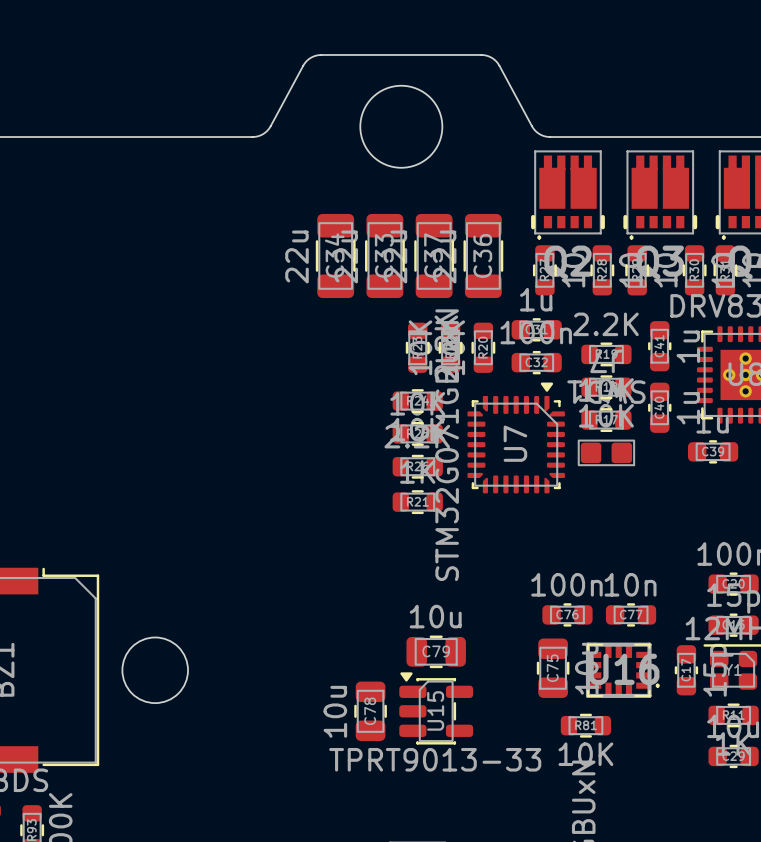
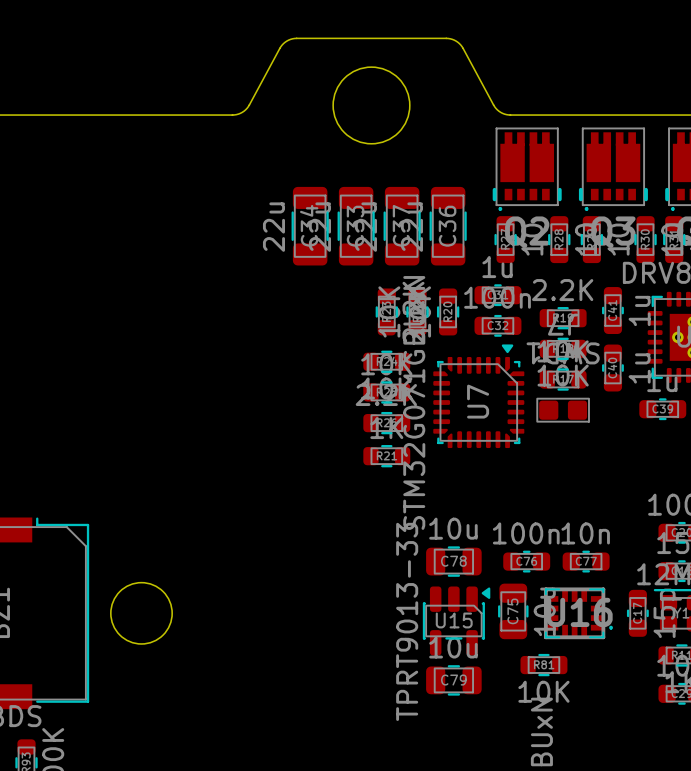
C79 position: (436, 651) -> (453, 680)
U15 rotation: 0° (436, 708) -> 90° clockwise (456, 620)
U15 position: (436, 708) -> (456, 620)
C78 rotation: 0° (370, 711) -> 90° clockwise (453, 561)
C78 position: (370, 711) -> (453, 561)

